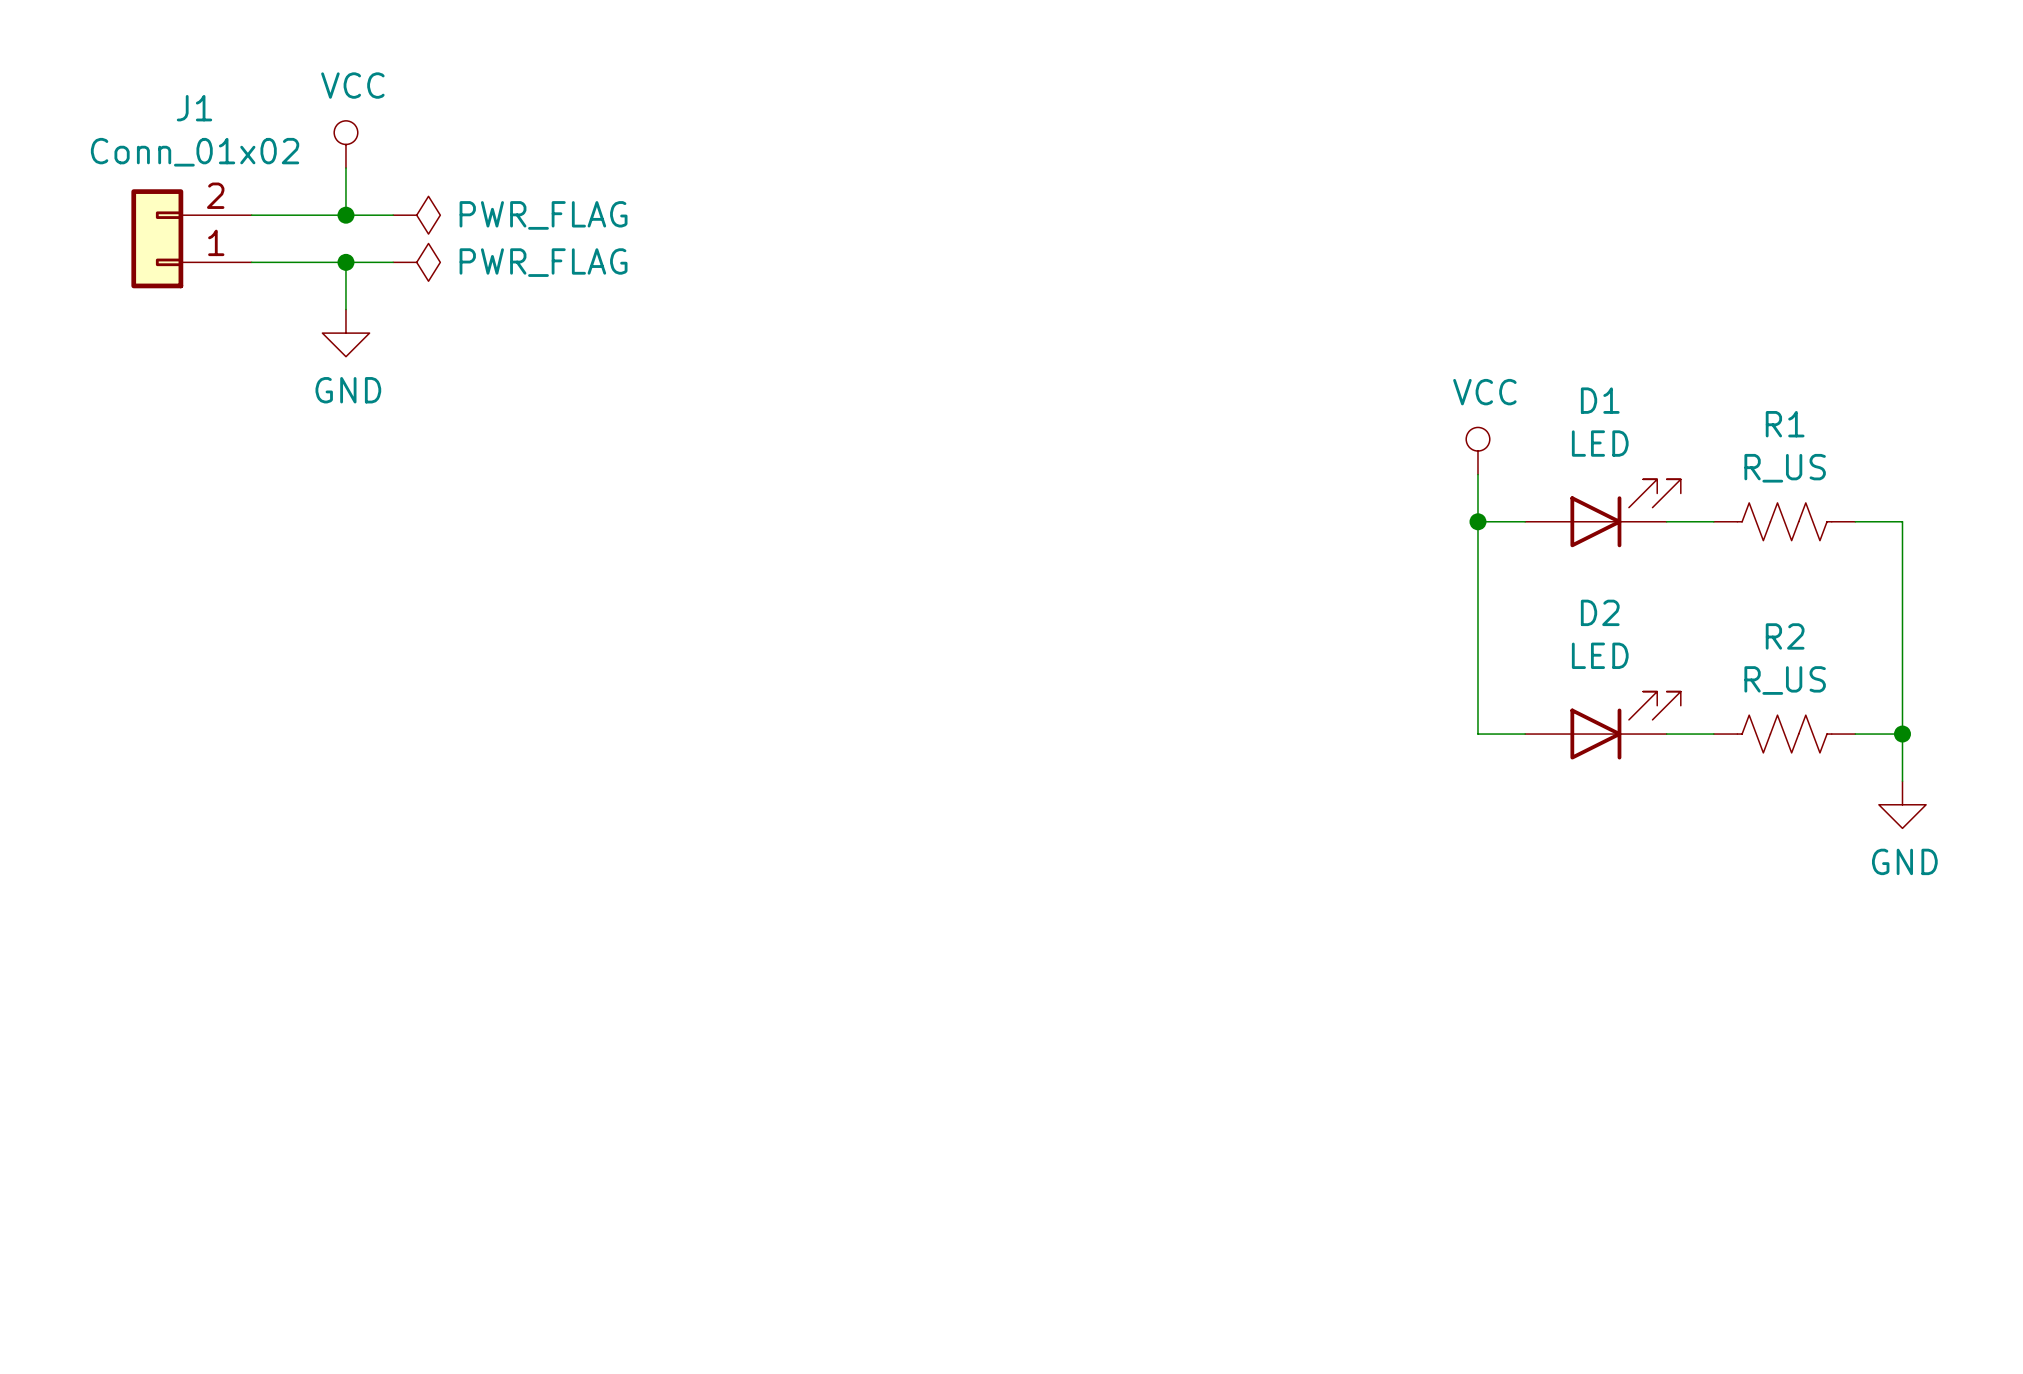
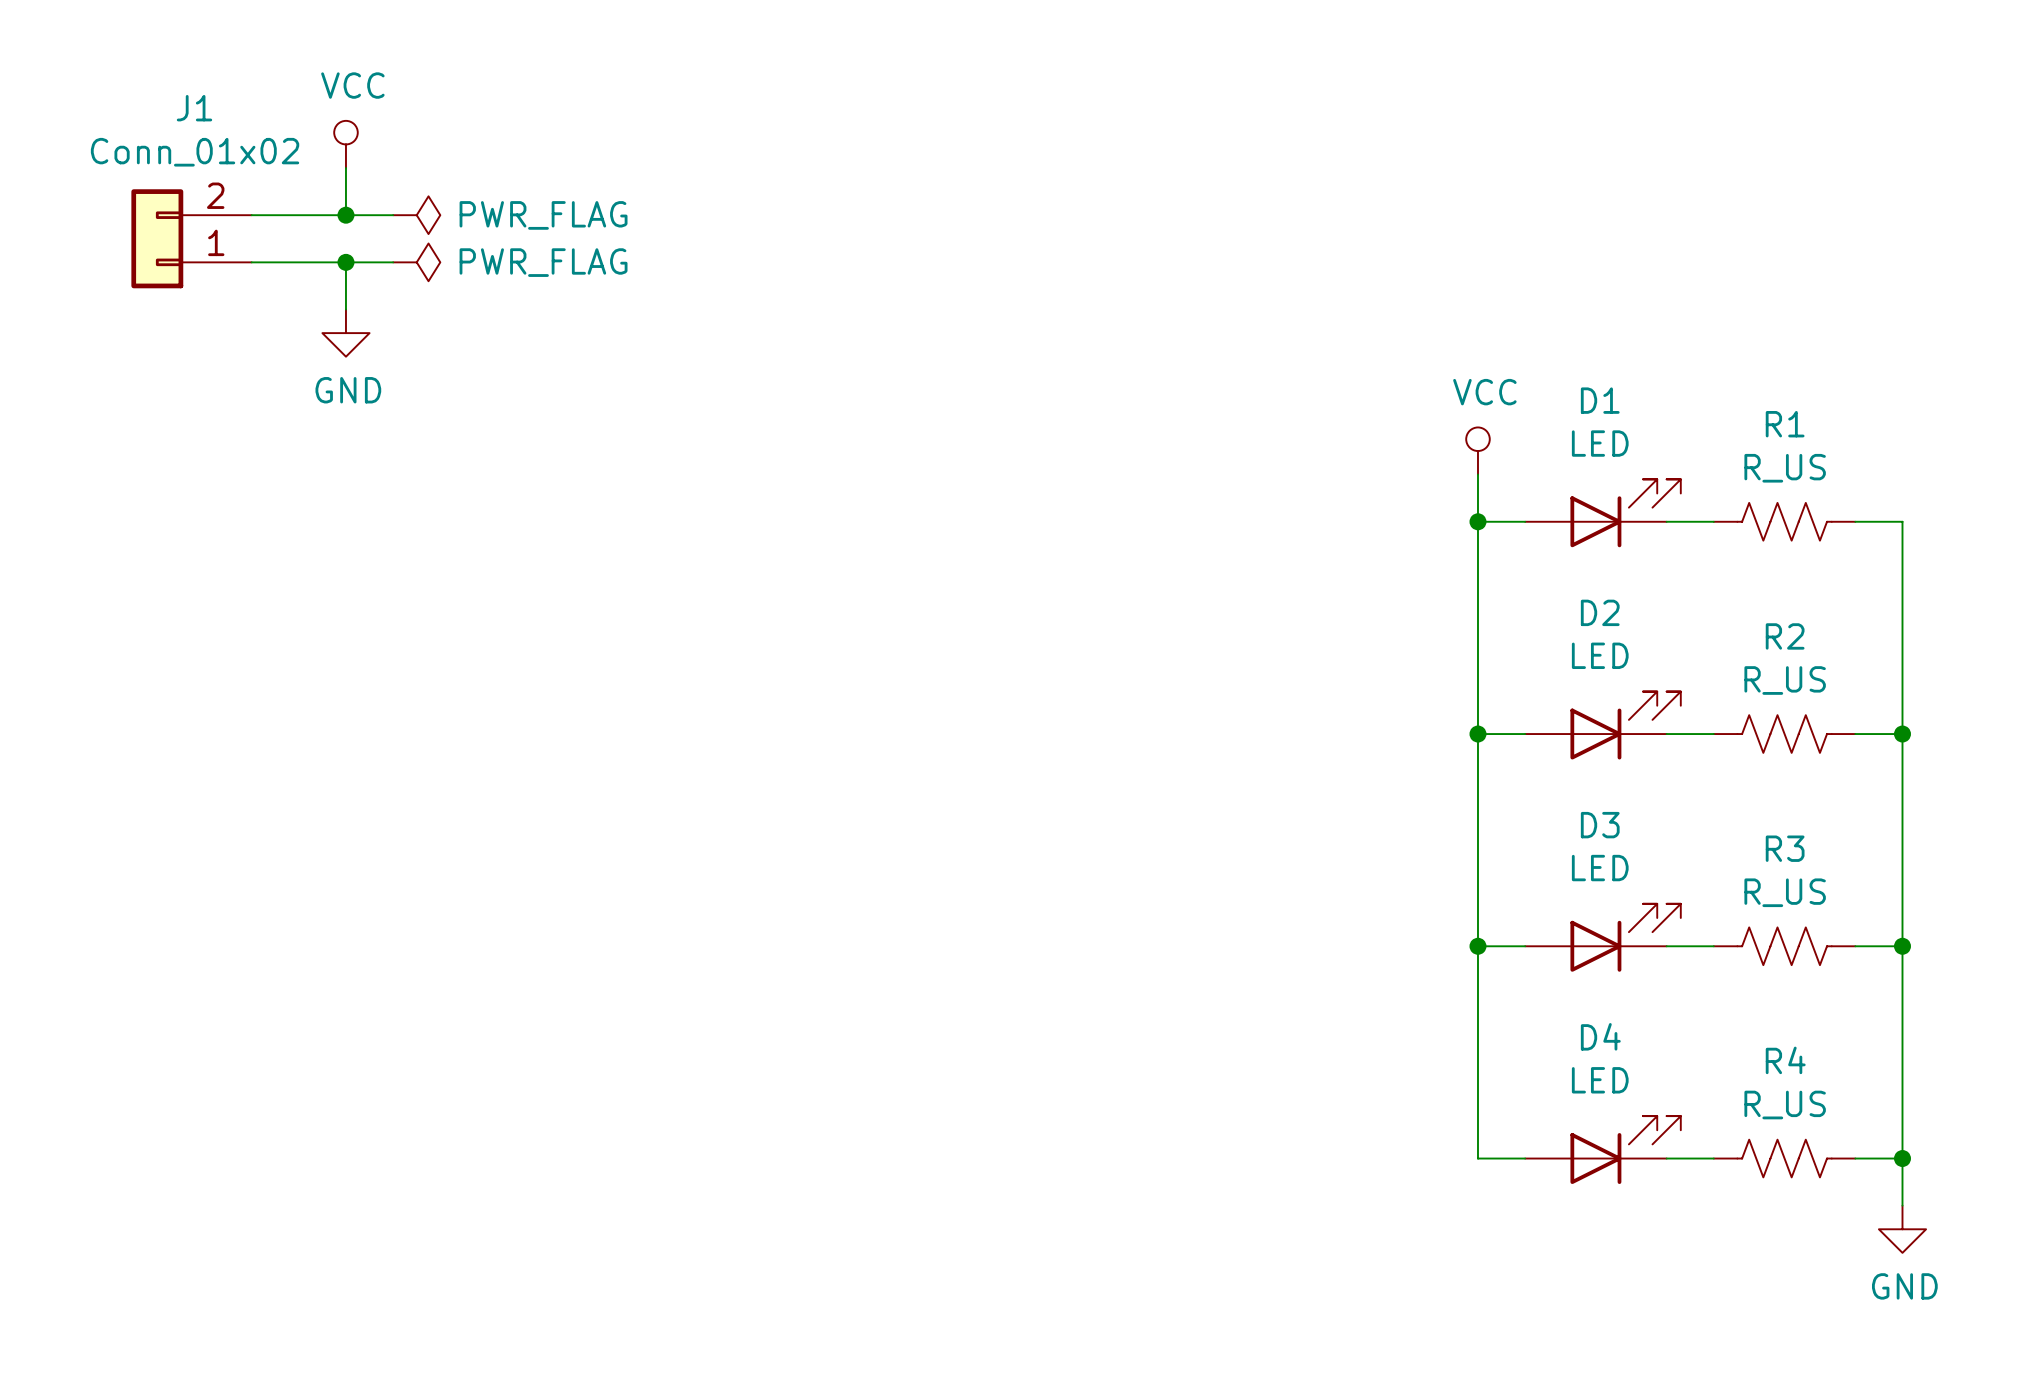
wire: none -> (1477, 734) (1477, 1158) (1525, 1158)
junction: none -> (1477, 734)
wire: none -> (1902, 781) (1902, 1205)
power symbol position: GND (1902, 804) -> GND (1902, 1229)
D3: none -> LED (1602, 937)
wire: none -> (1477, 946) (1525, 946)
junction: none -> (1477, 946)
wire: none -> (1666, 946) (1713, 946)
R3: none -> R_US (1784, 946)
wire: none -> (1855, 946) (1902, 946)
junction: none -> (1902, 946)
D4: none -> LED (1602, 1150)
wire: none -> (1666, 1158) (1713, 1158)
R4: none -> R_US (1784, 1158)
wire: none -> (1855, 1158) (1902, 1158)
junction: none -> (1902, 1158)

